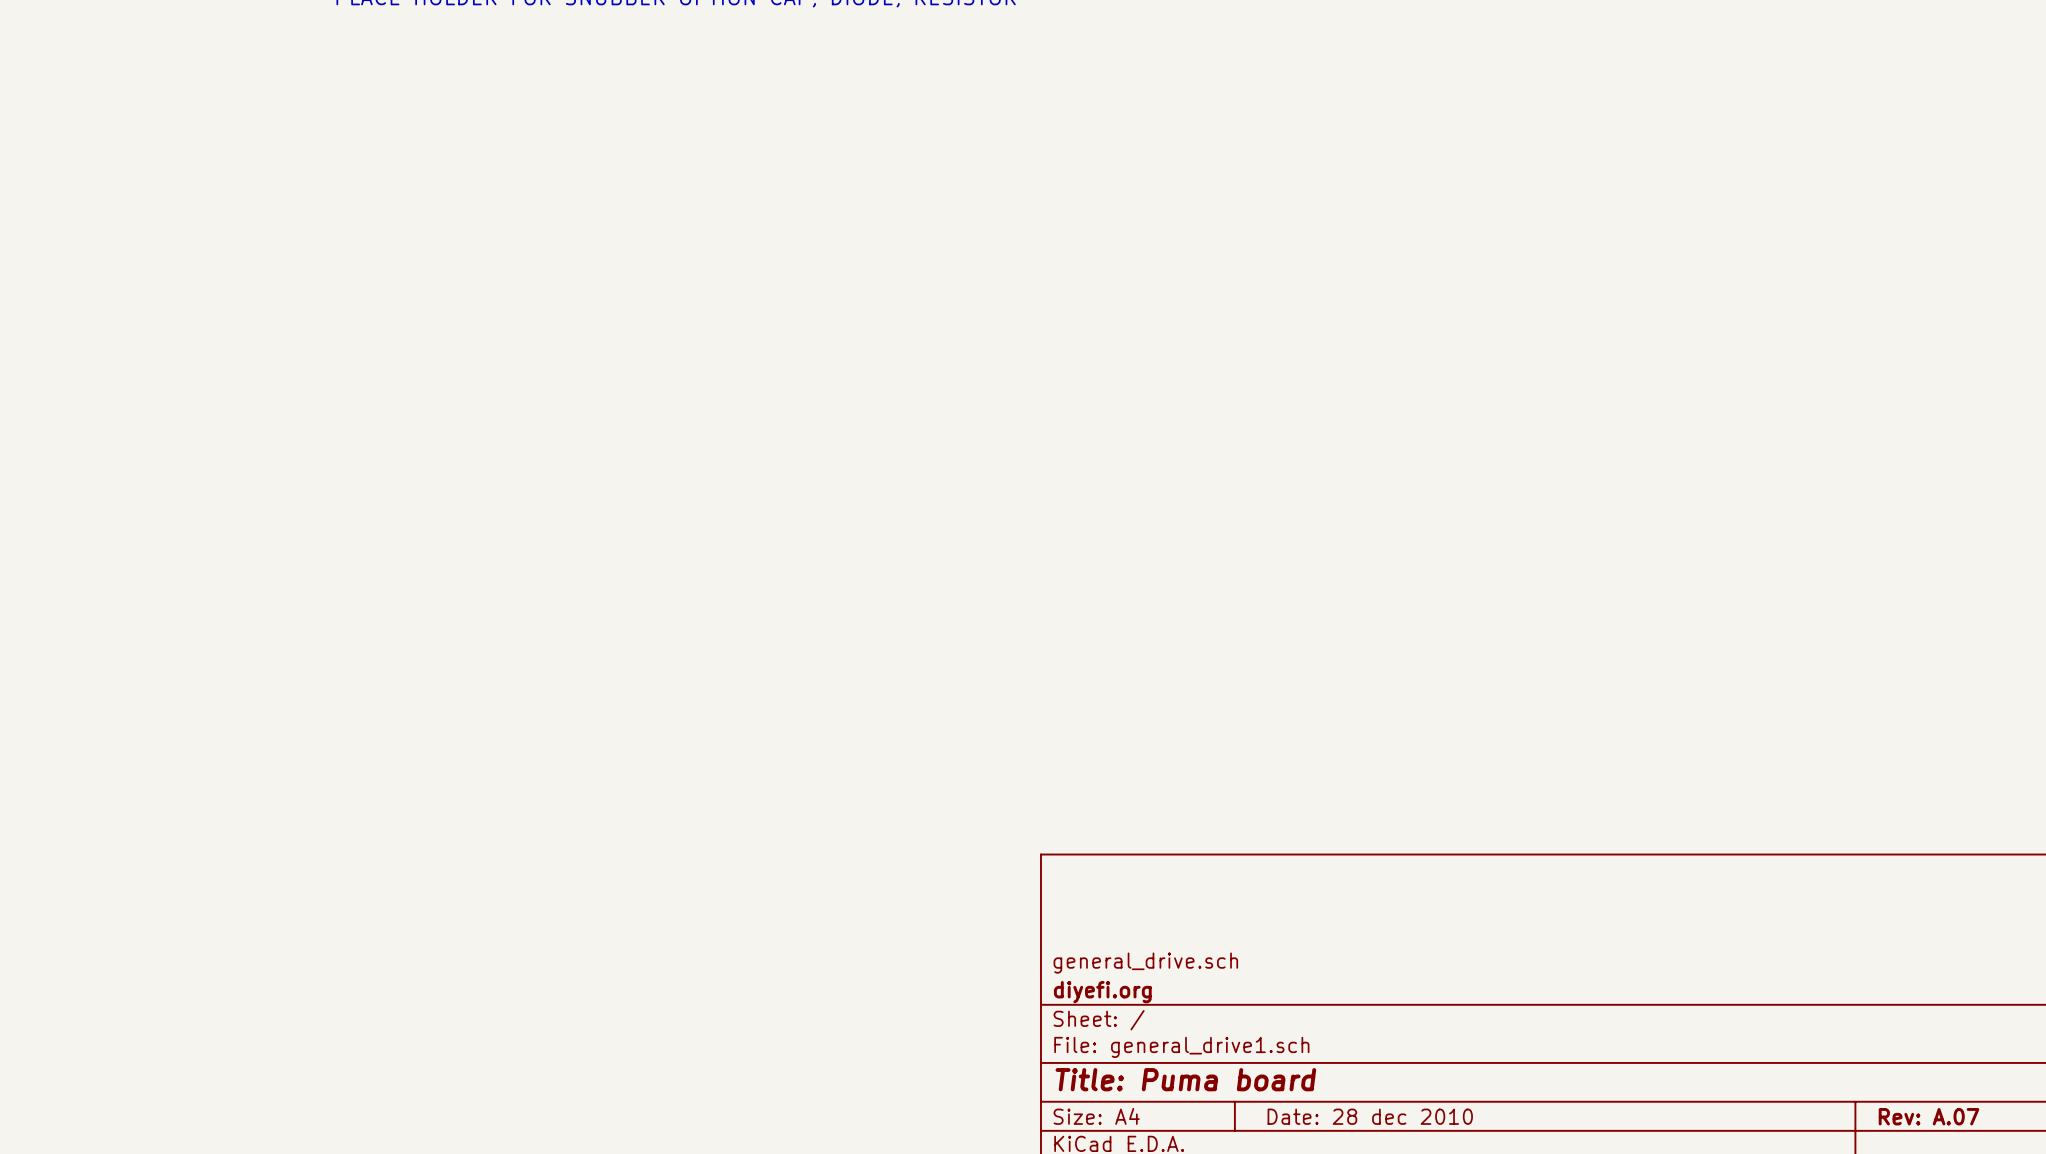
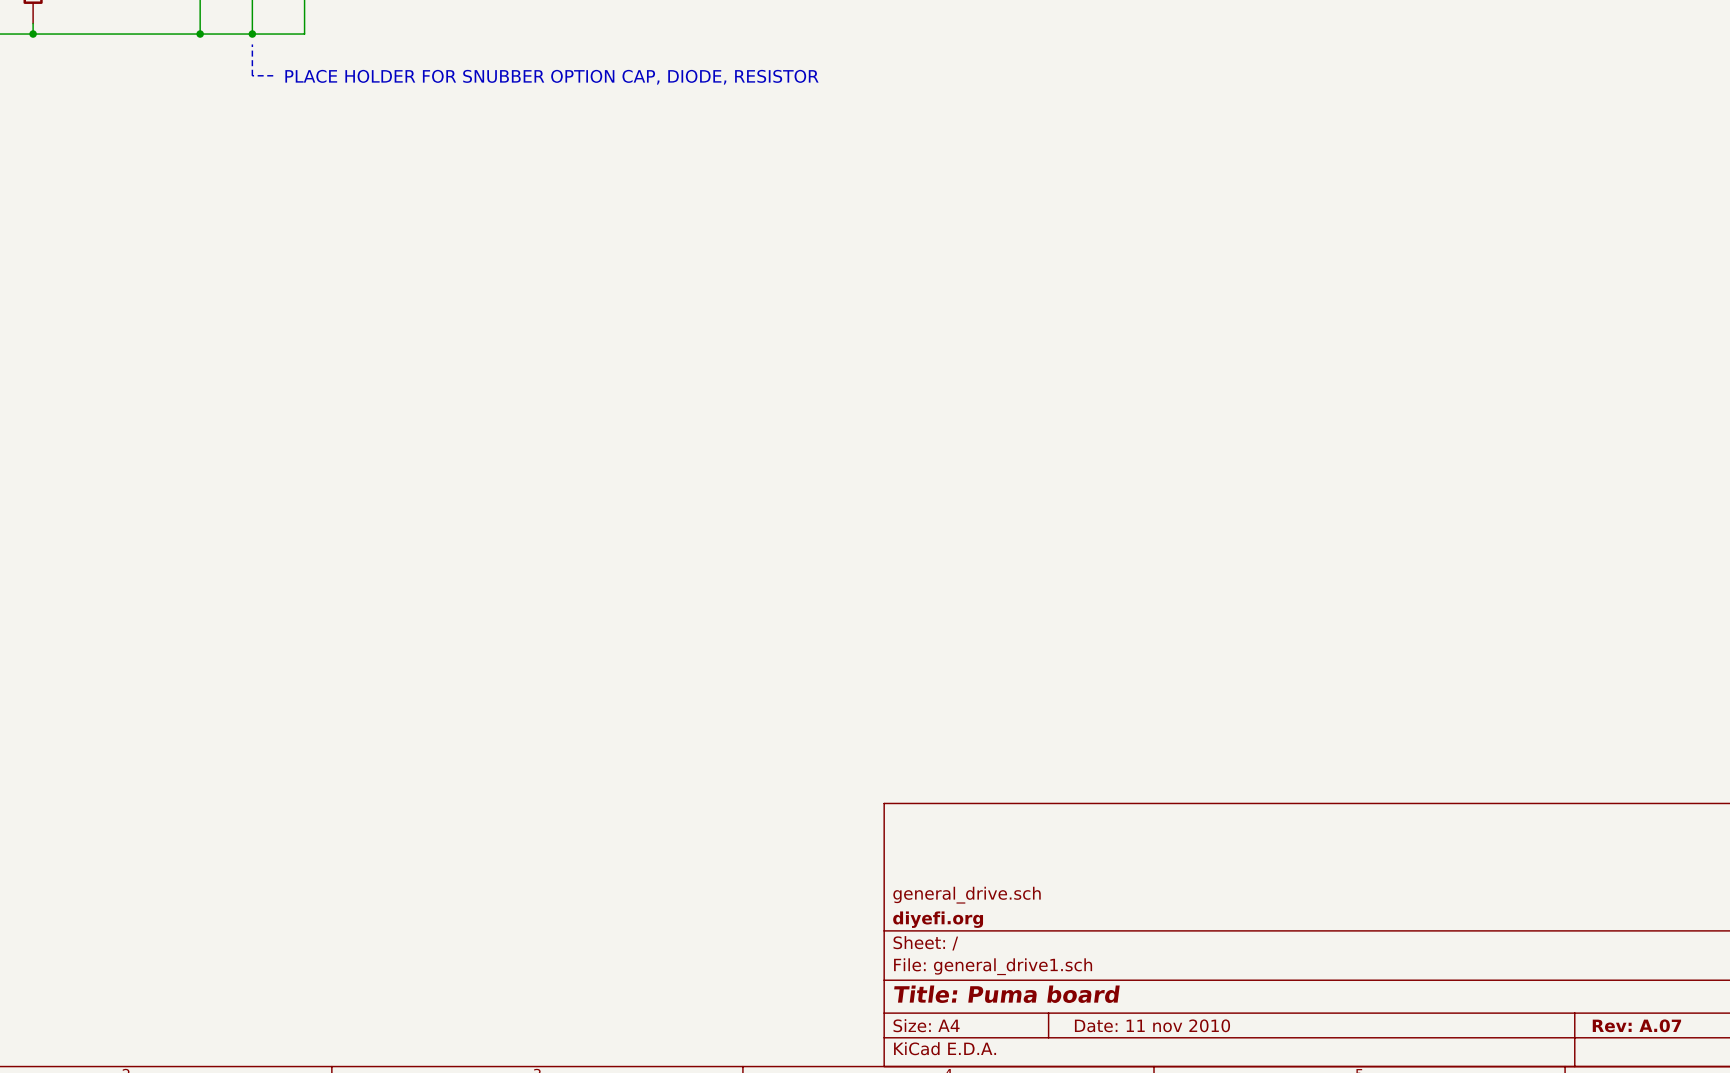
title block: Date: 28 dec 2010 (1370, 1116) -> Date: 11 nov 2010 (1152, 1025)

